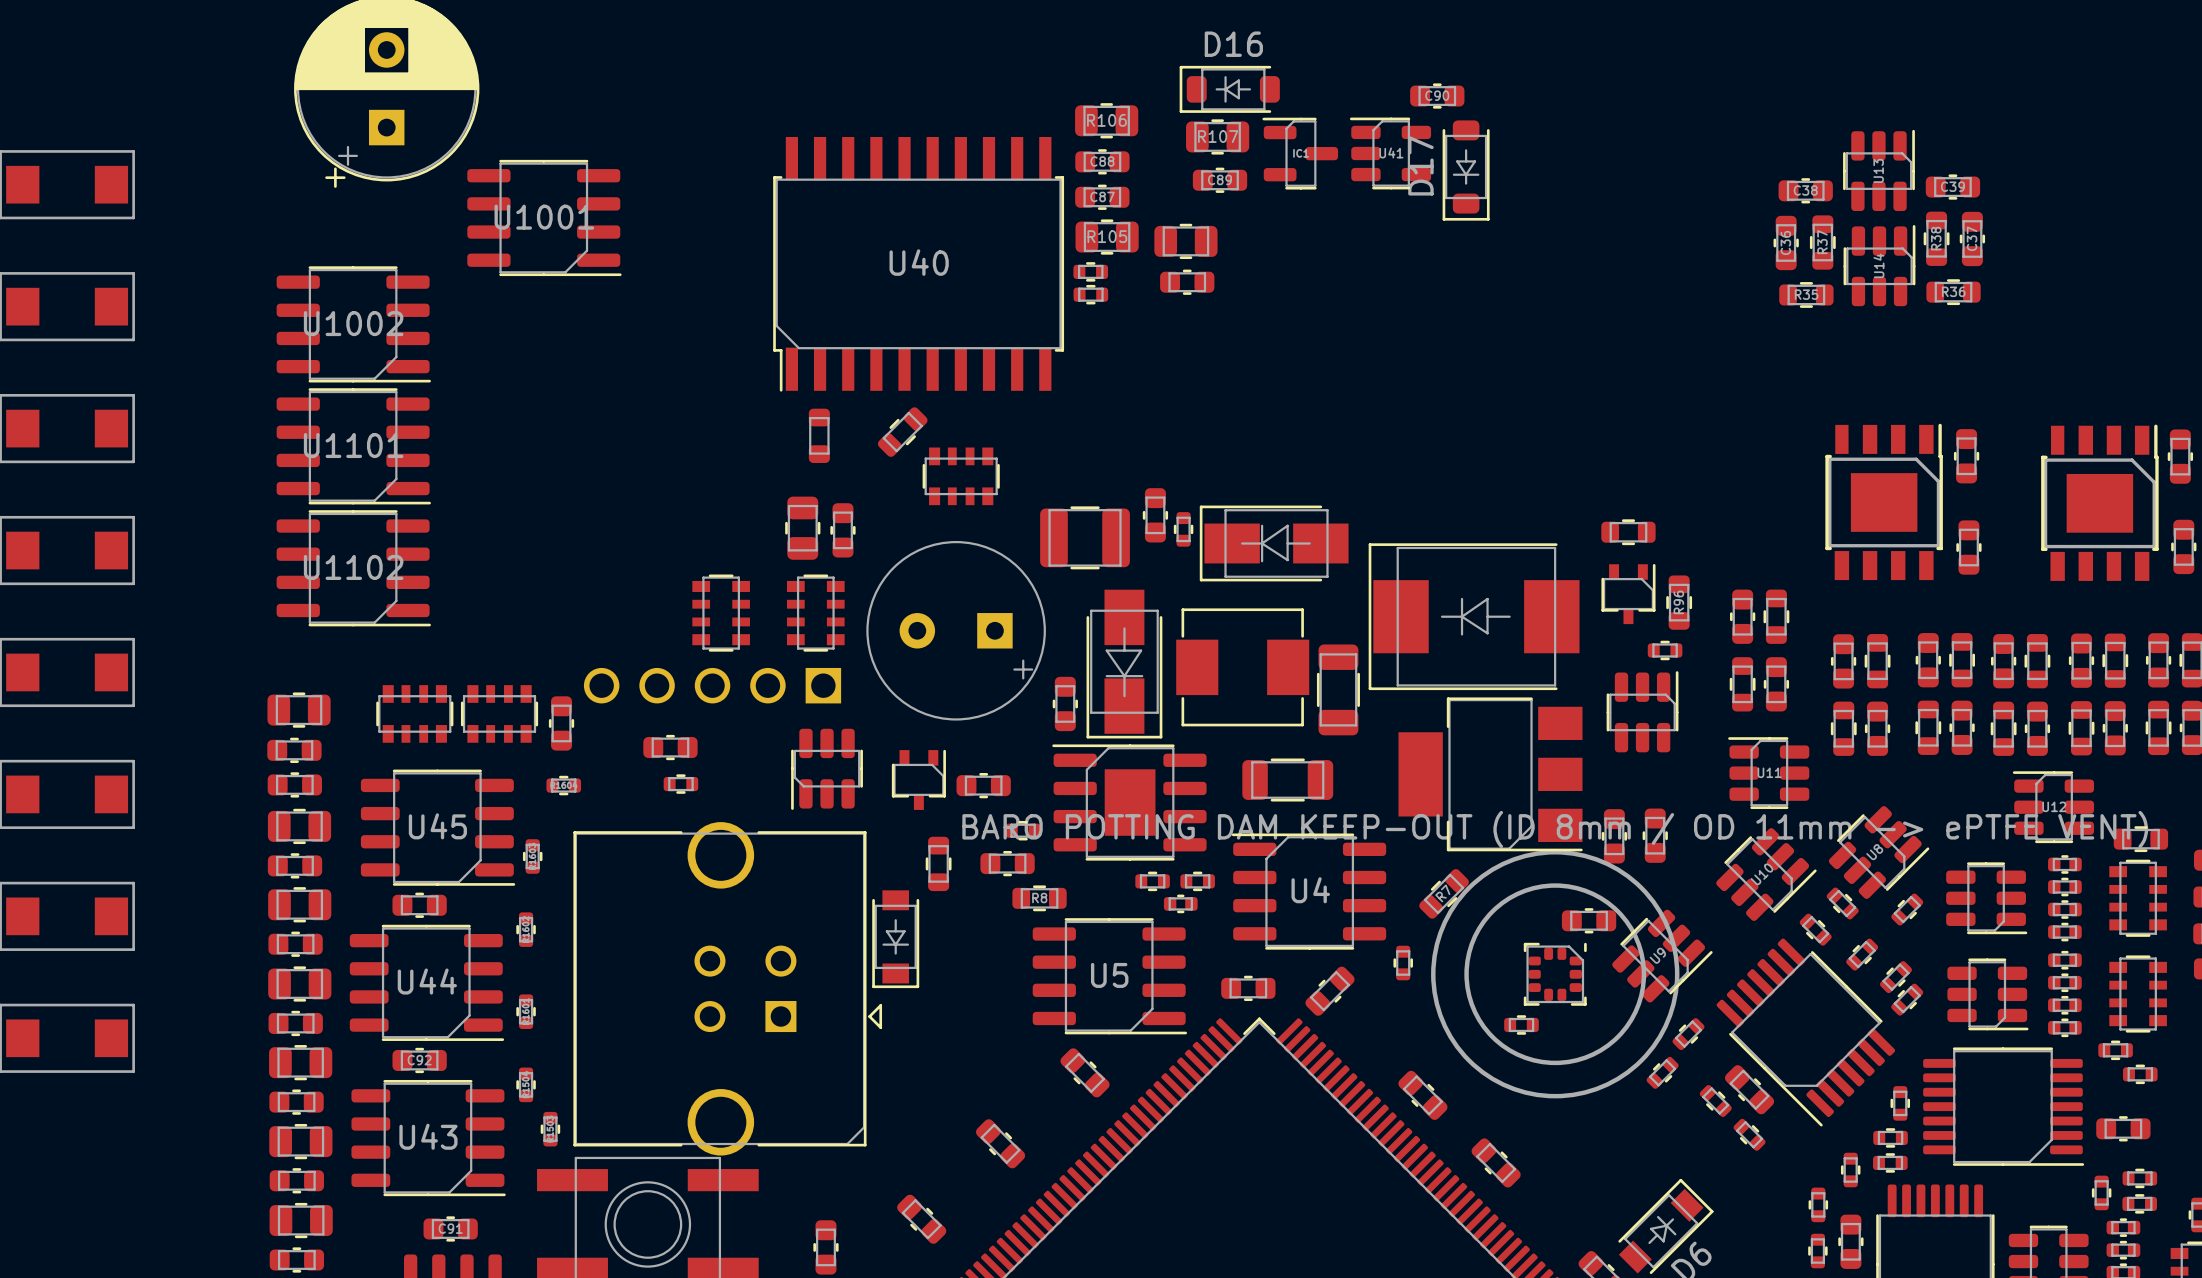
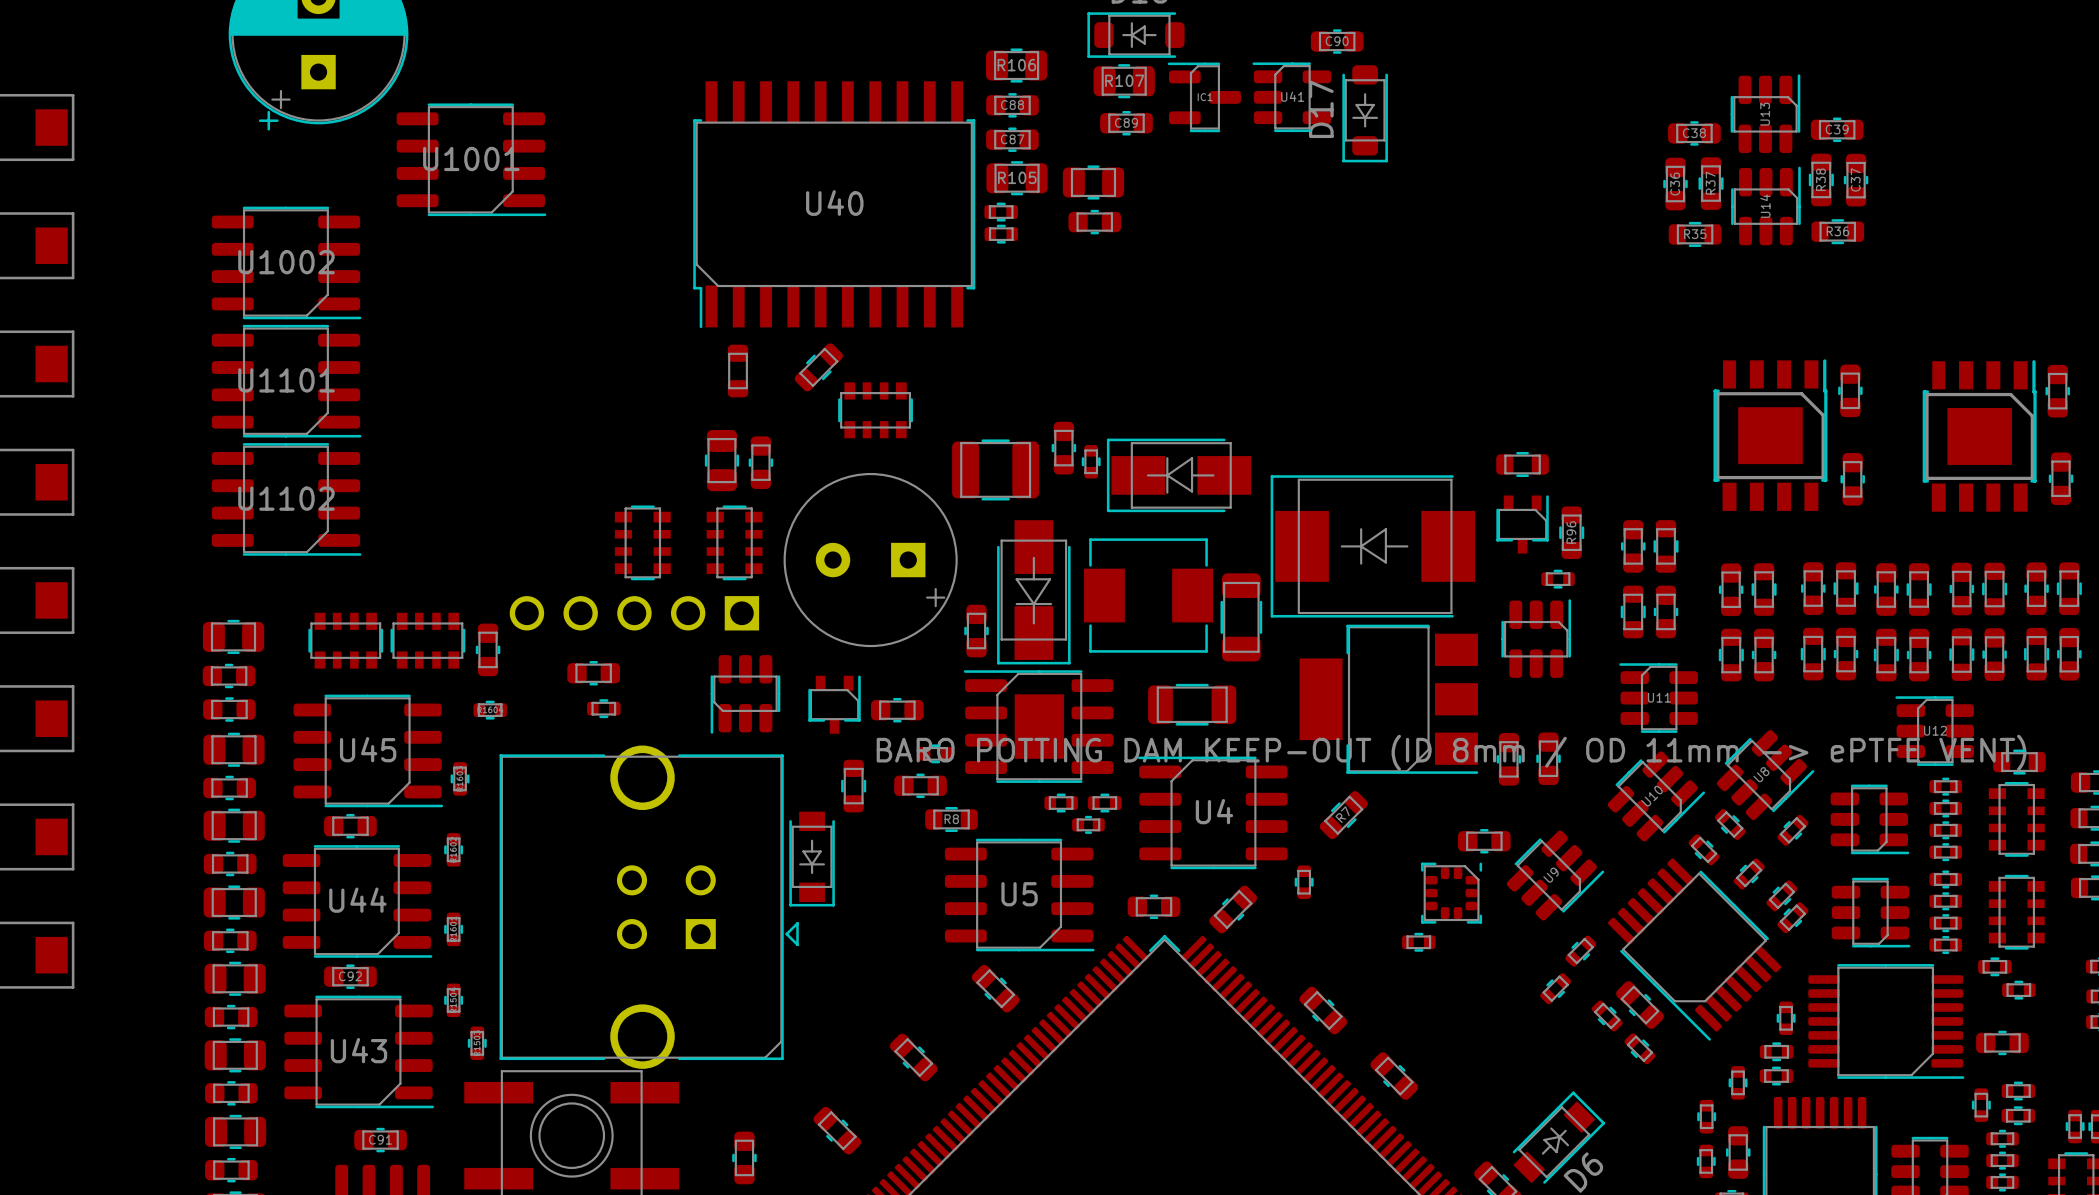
drawing: [1431, 850, 1680, 1099] -> none

